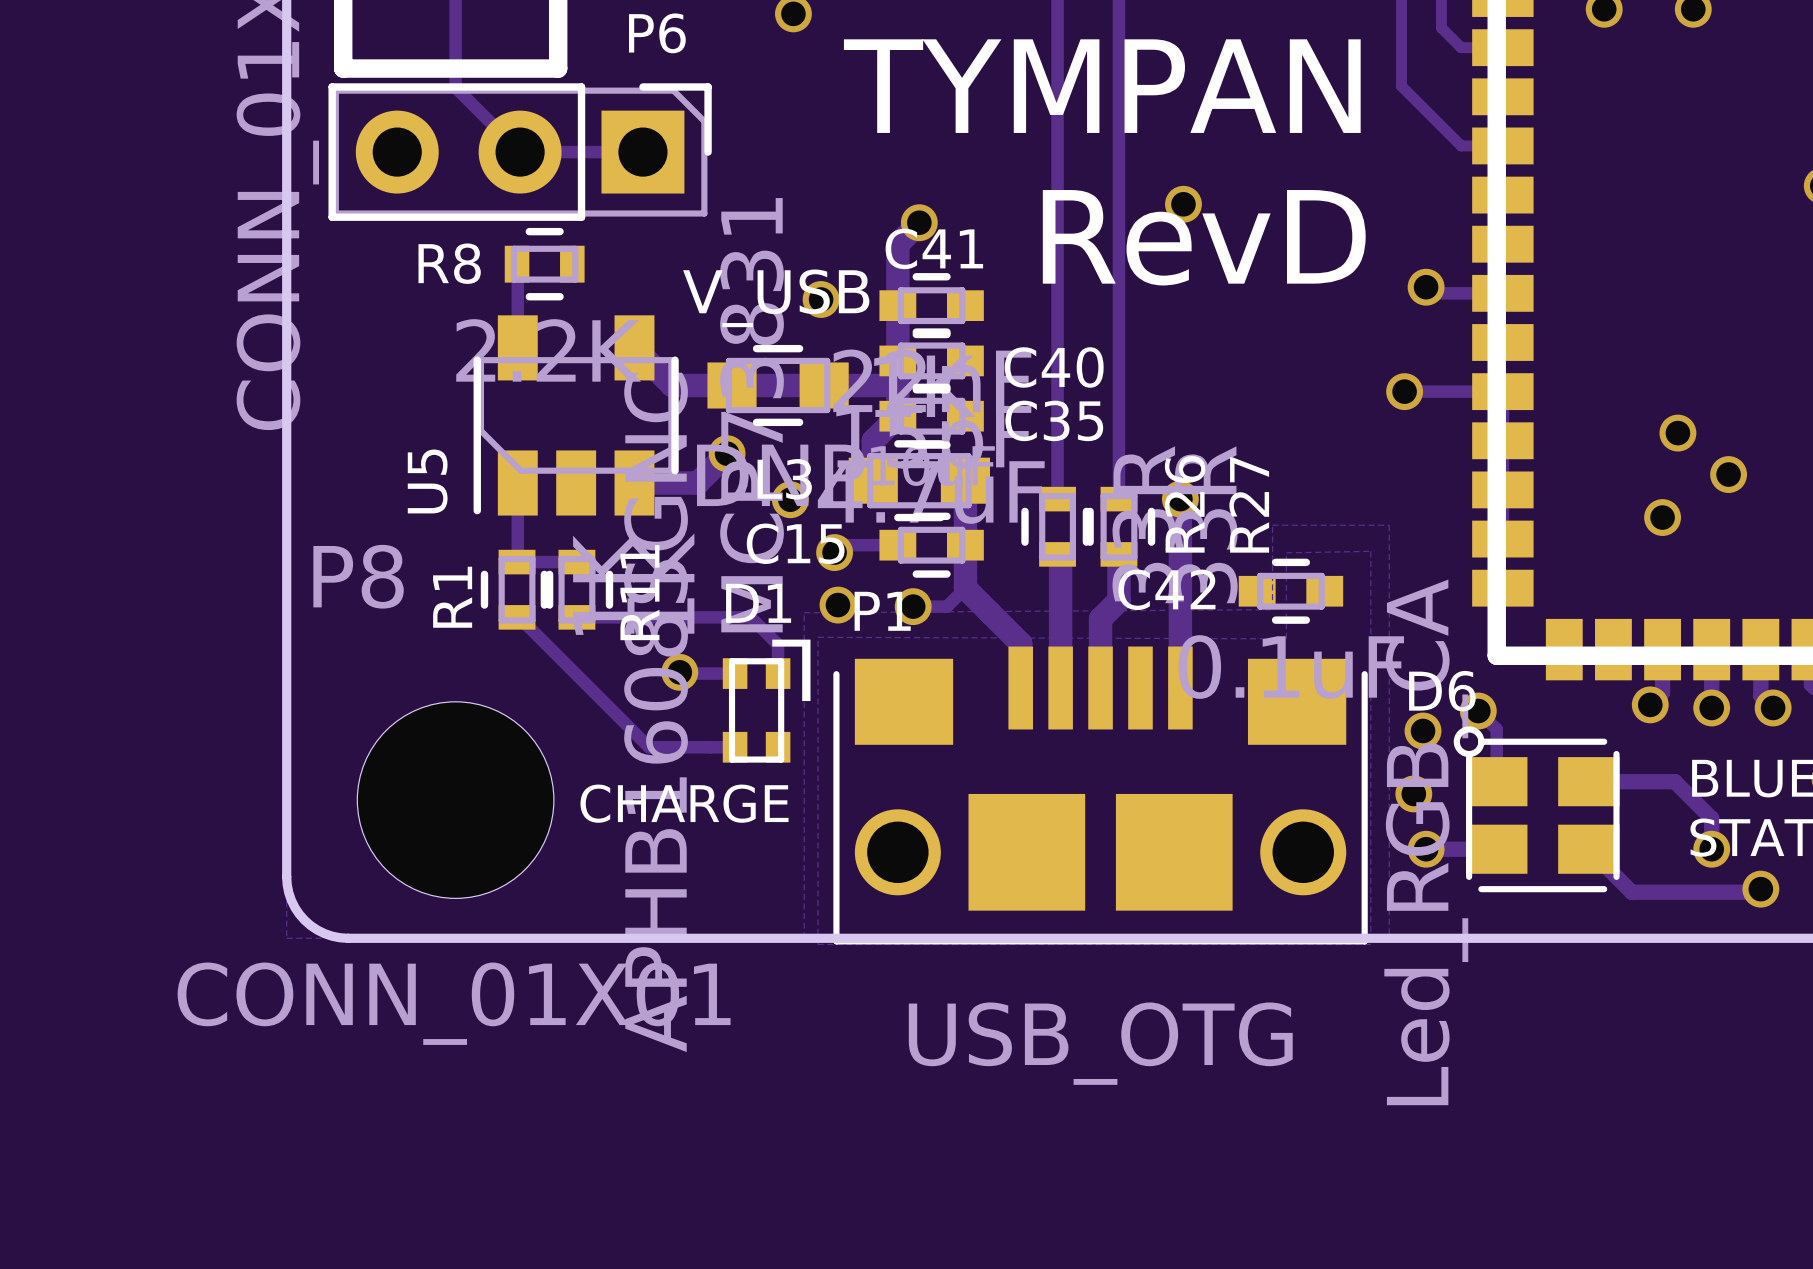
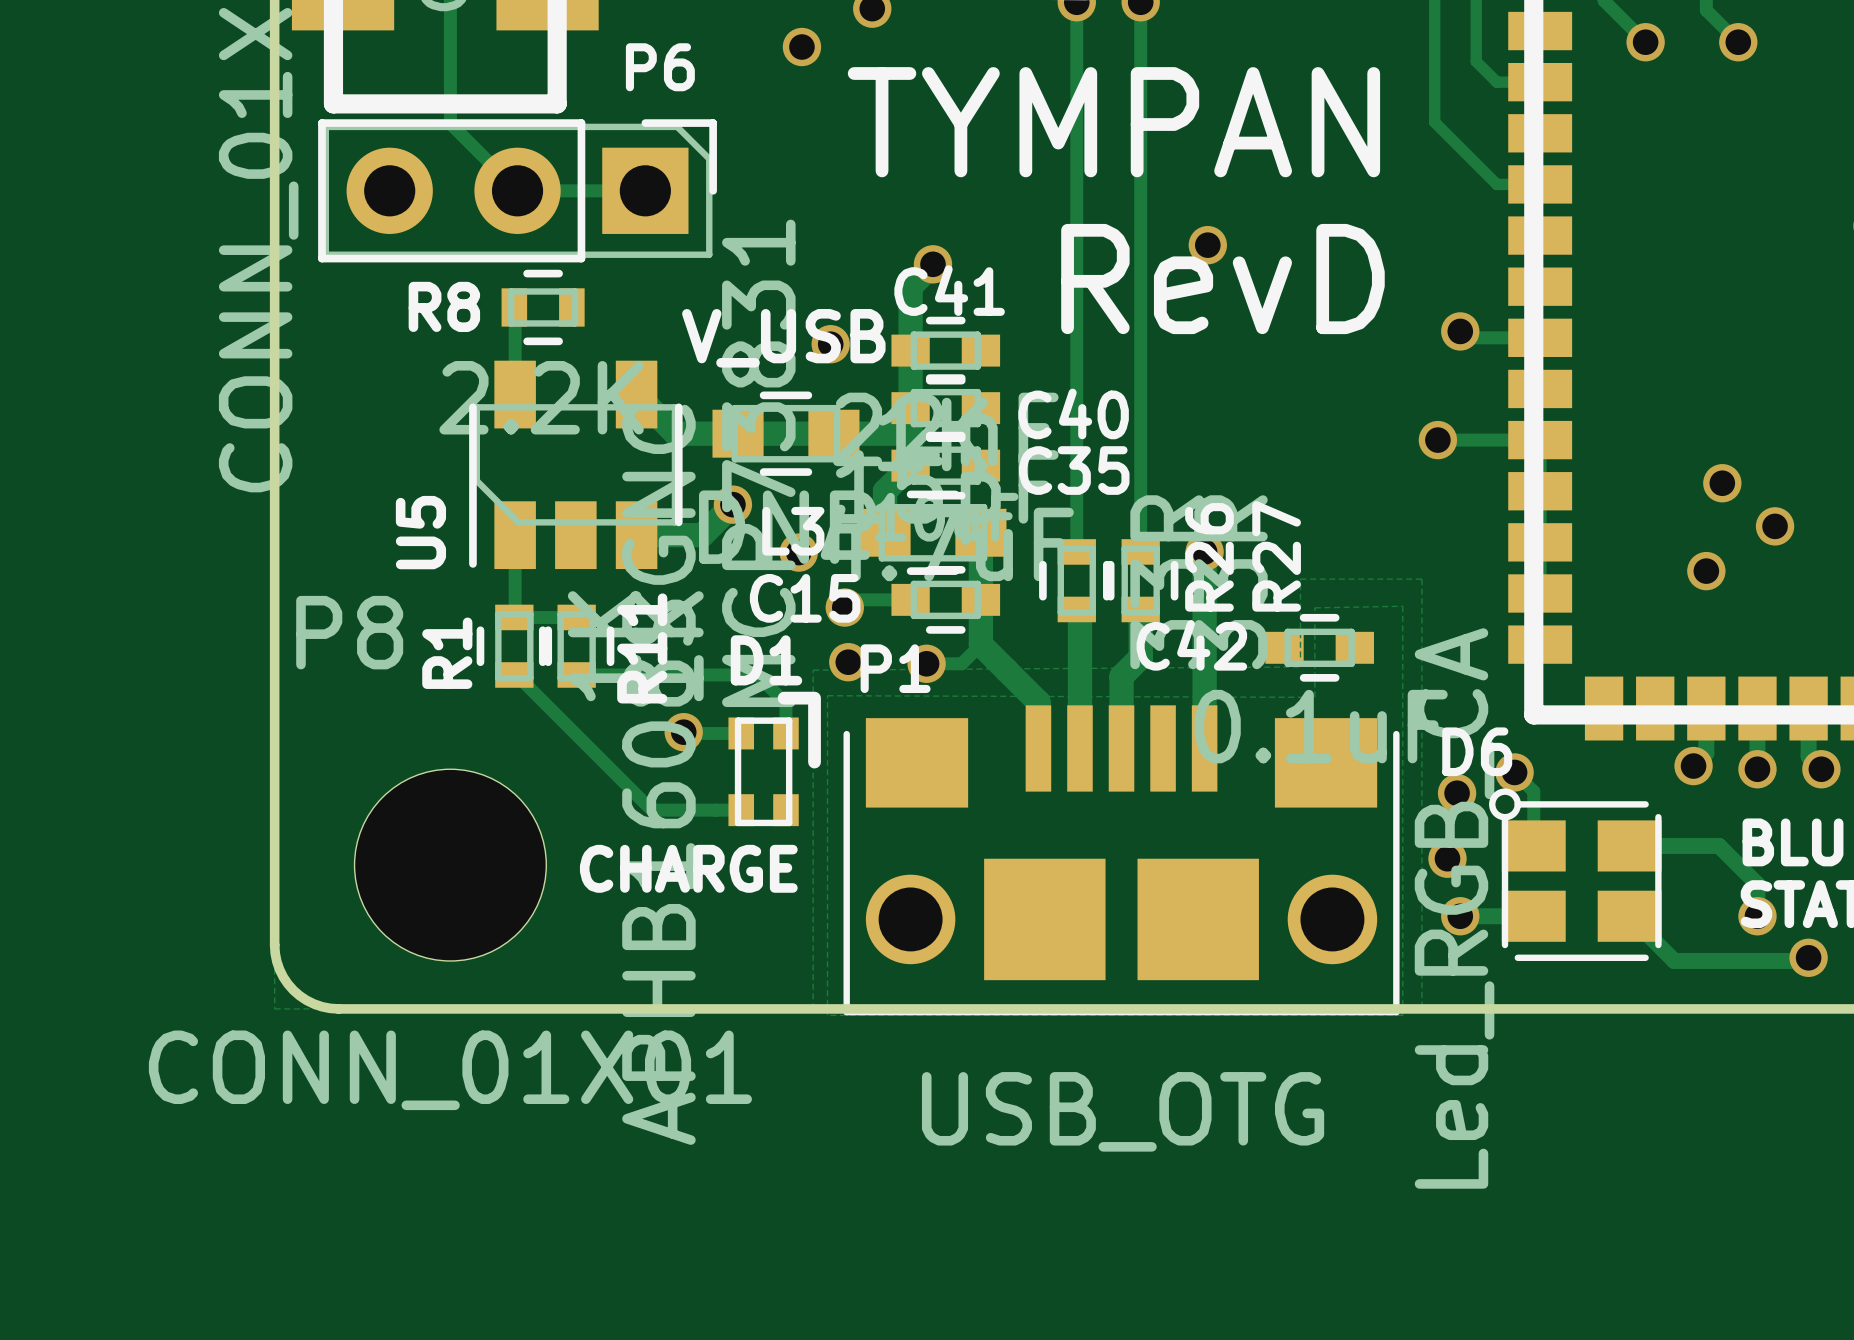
P8 footprint: [357, 701, 554, 899] -> [354, 769, 547, 961]

